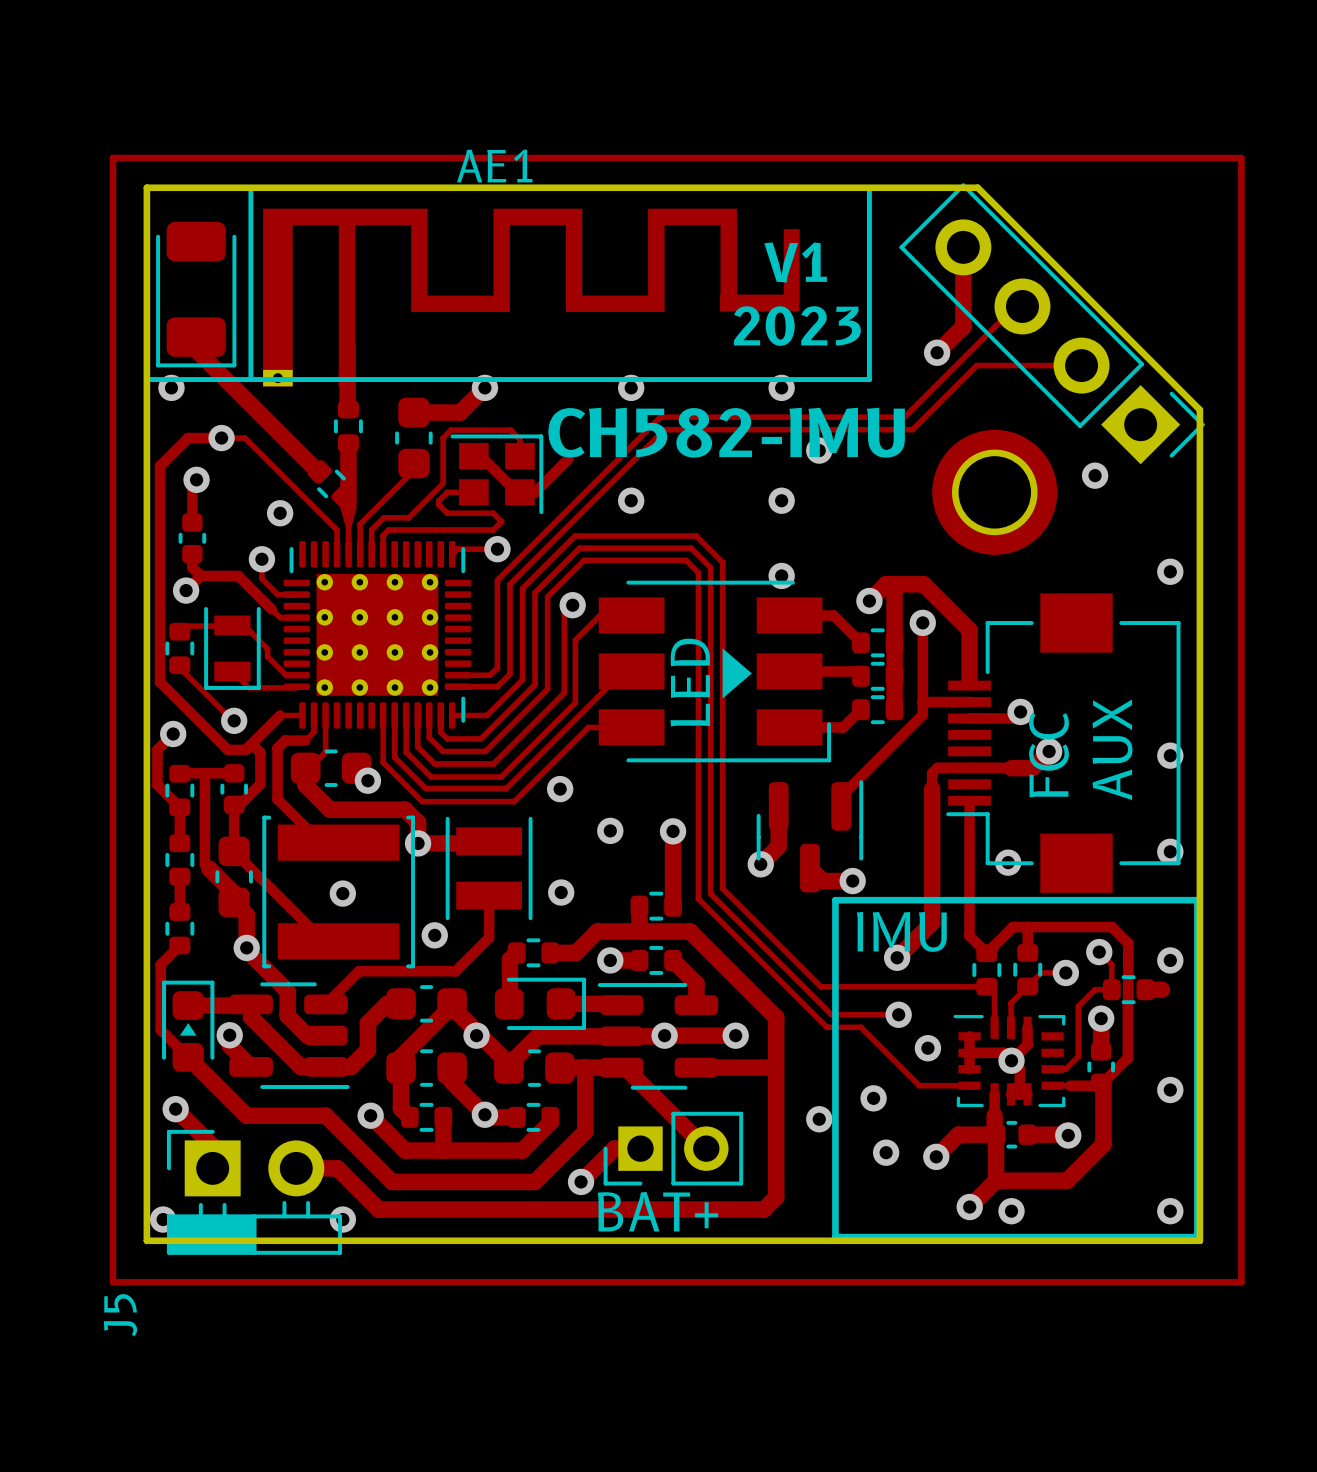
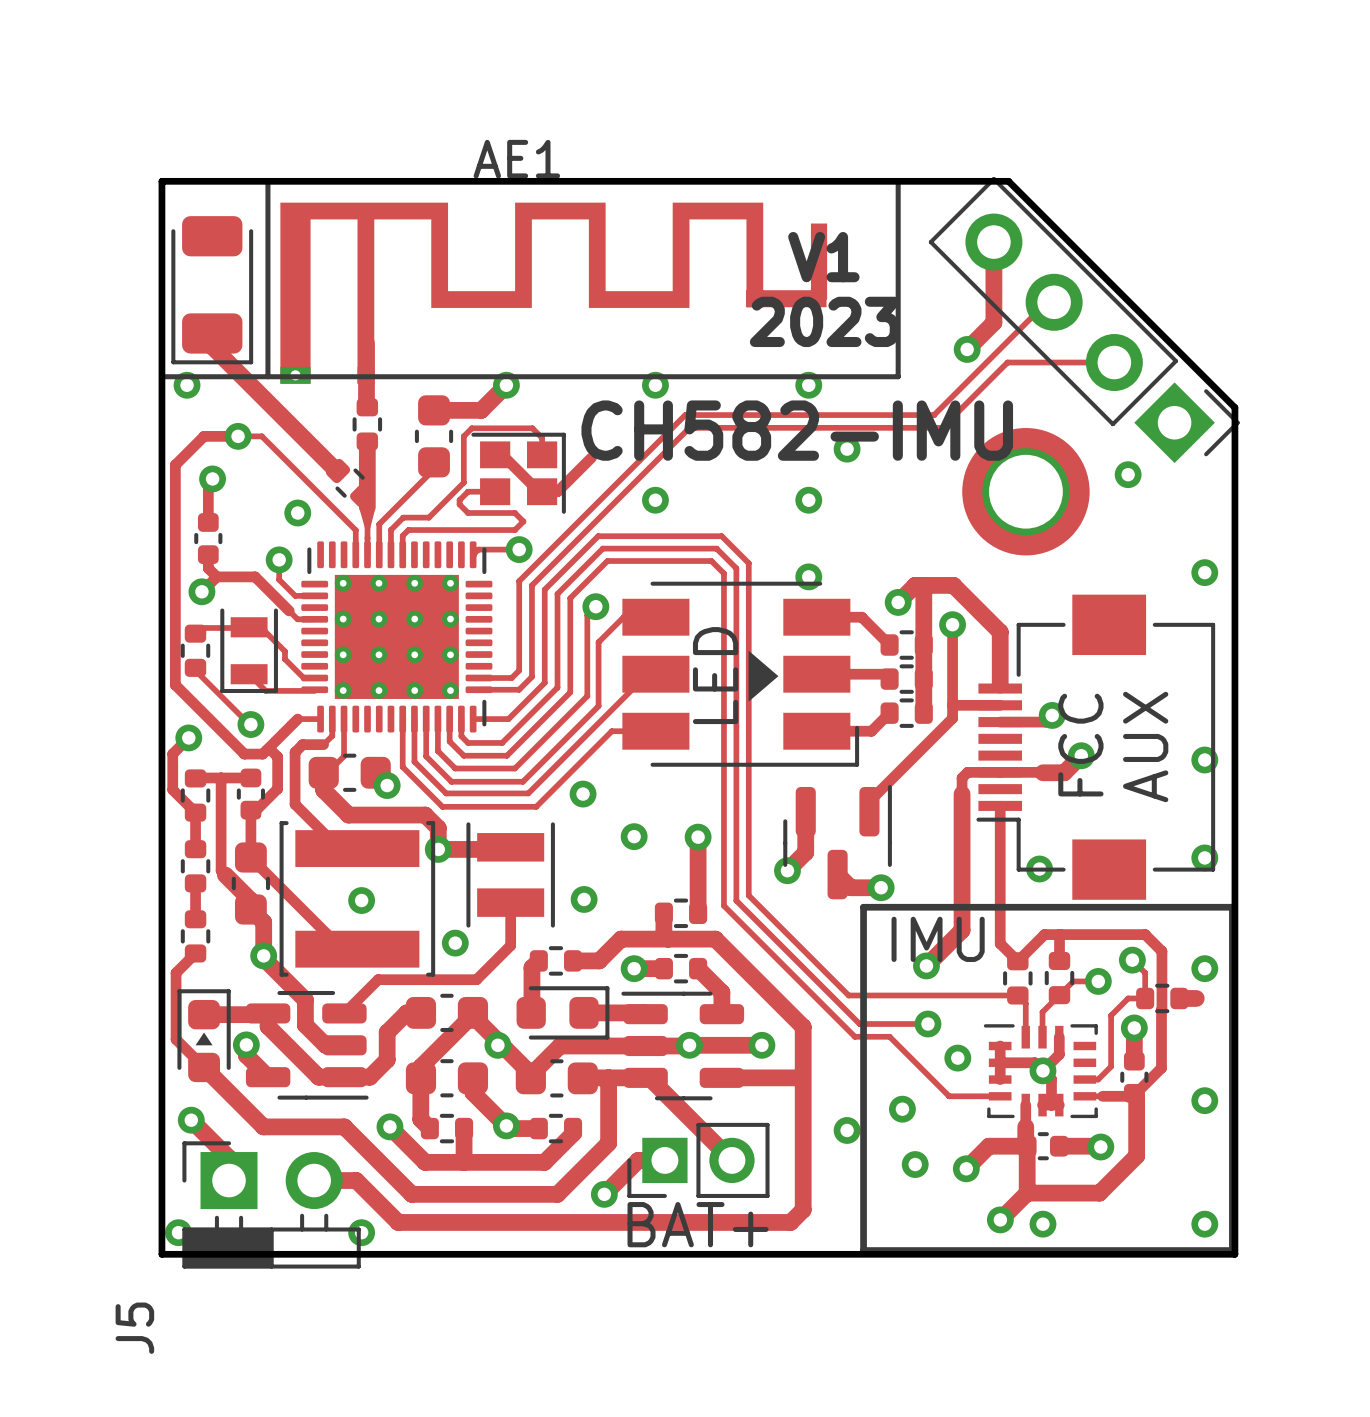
track: (112, 158) (1241, 158) (1241, 1282) (112, 1282) (112, 158) -> none

